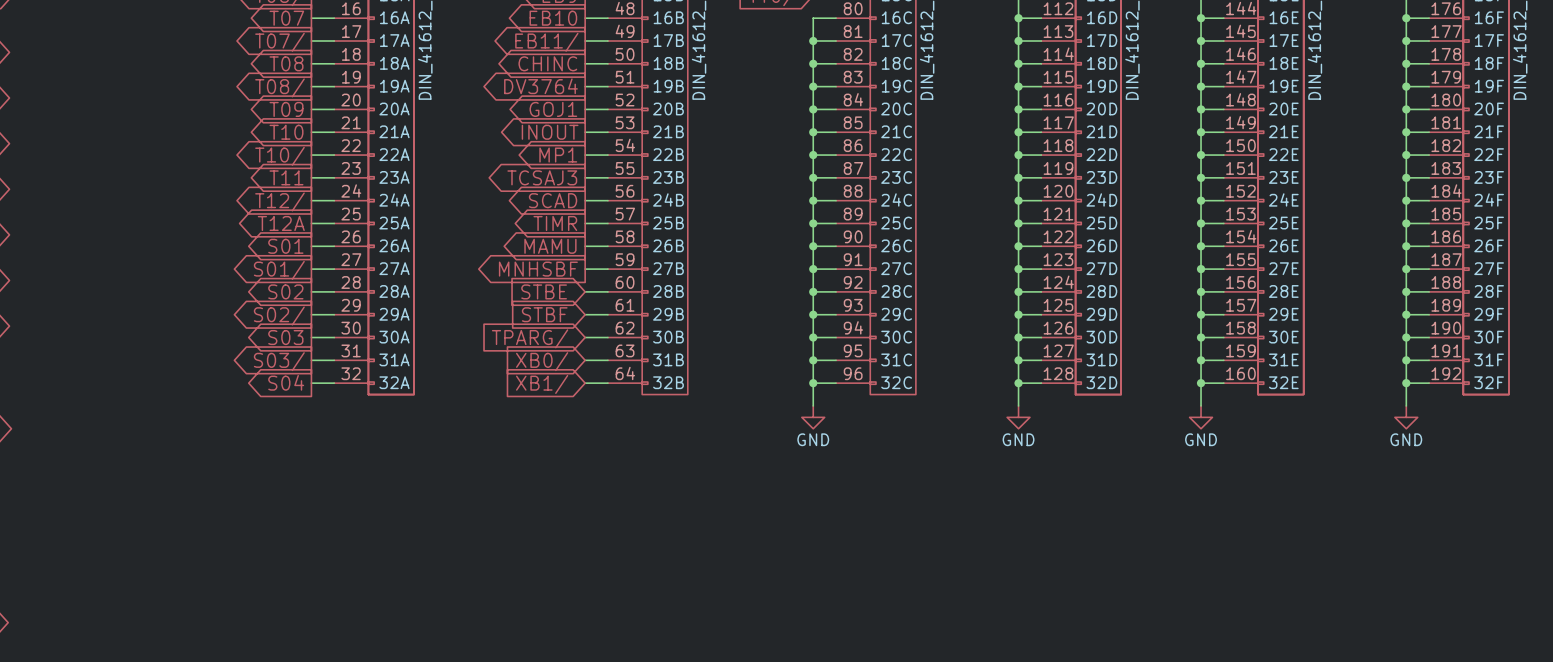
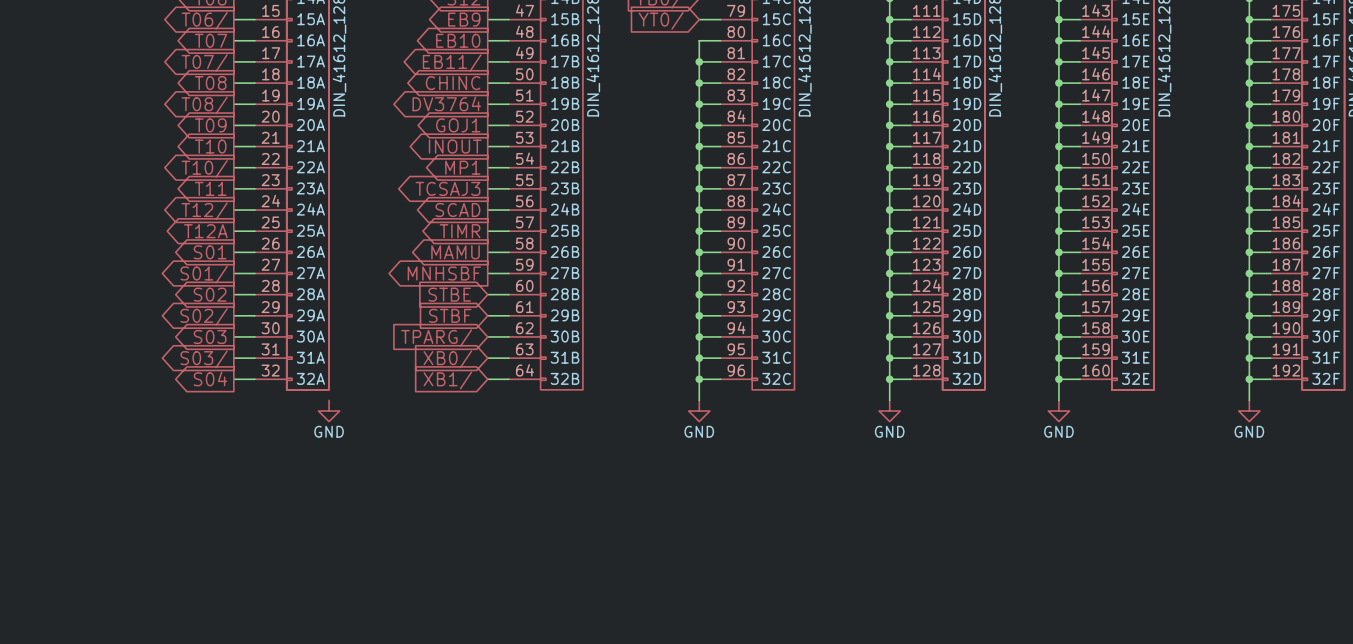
power symbol: none -> GND (329, 411)

